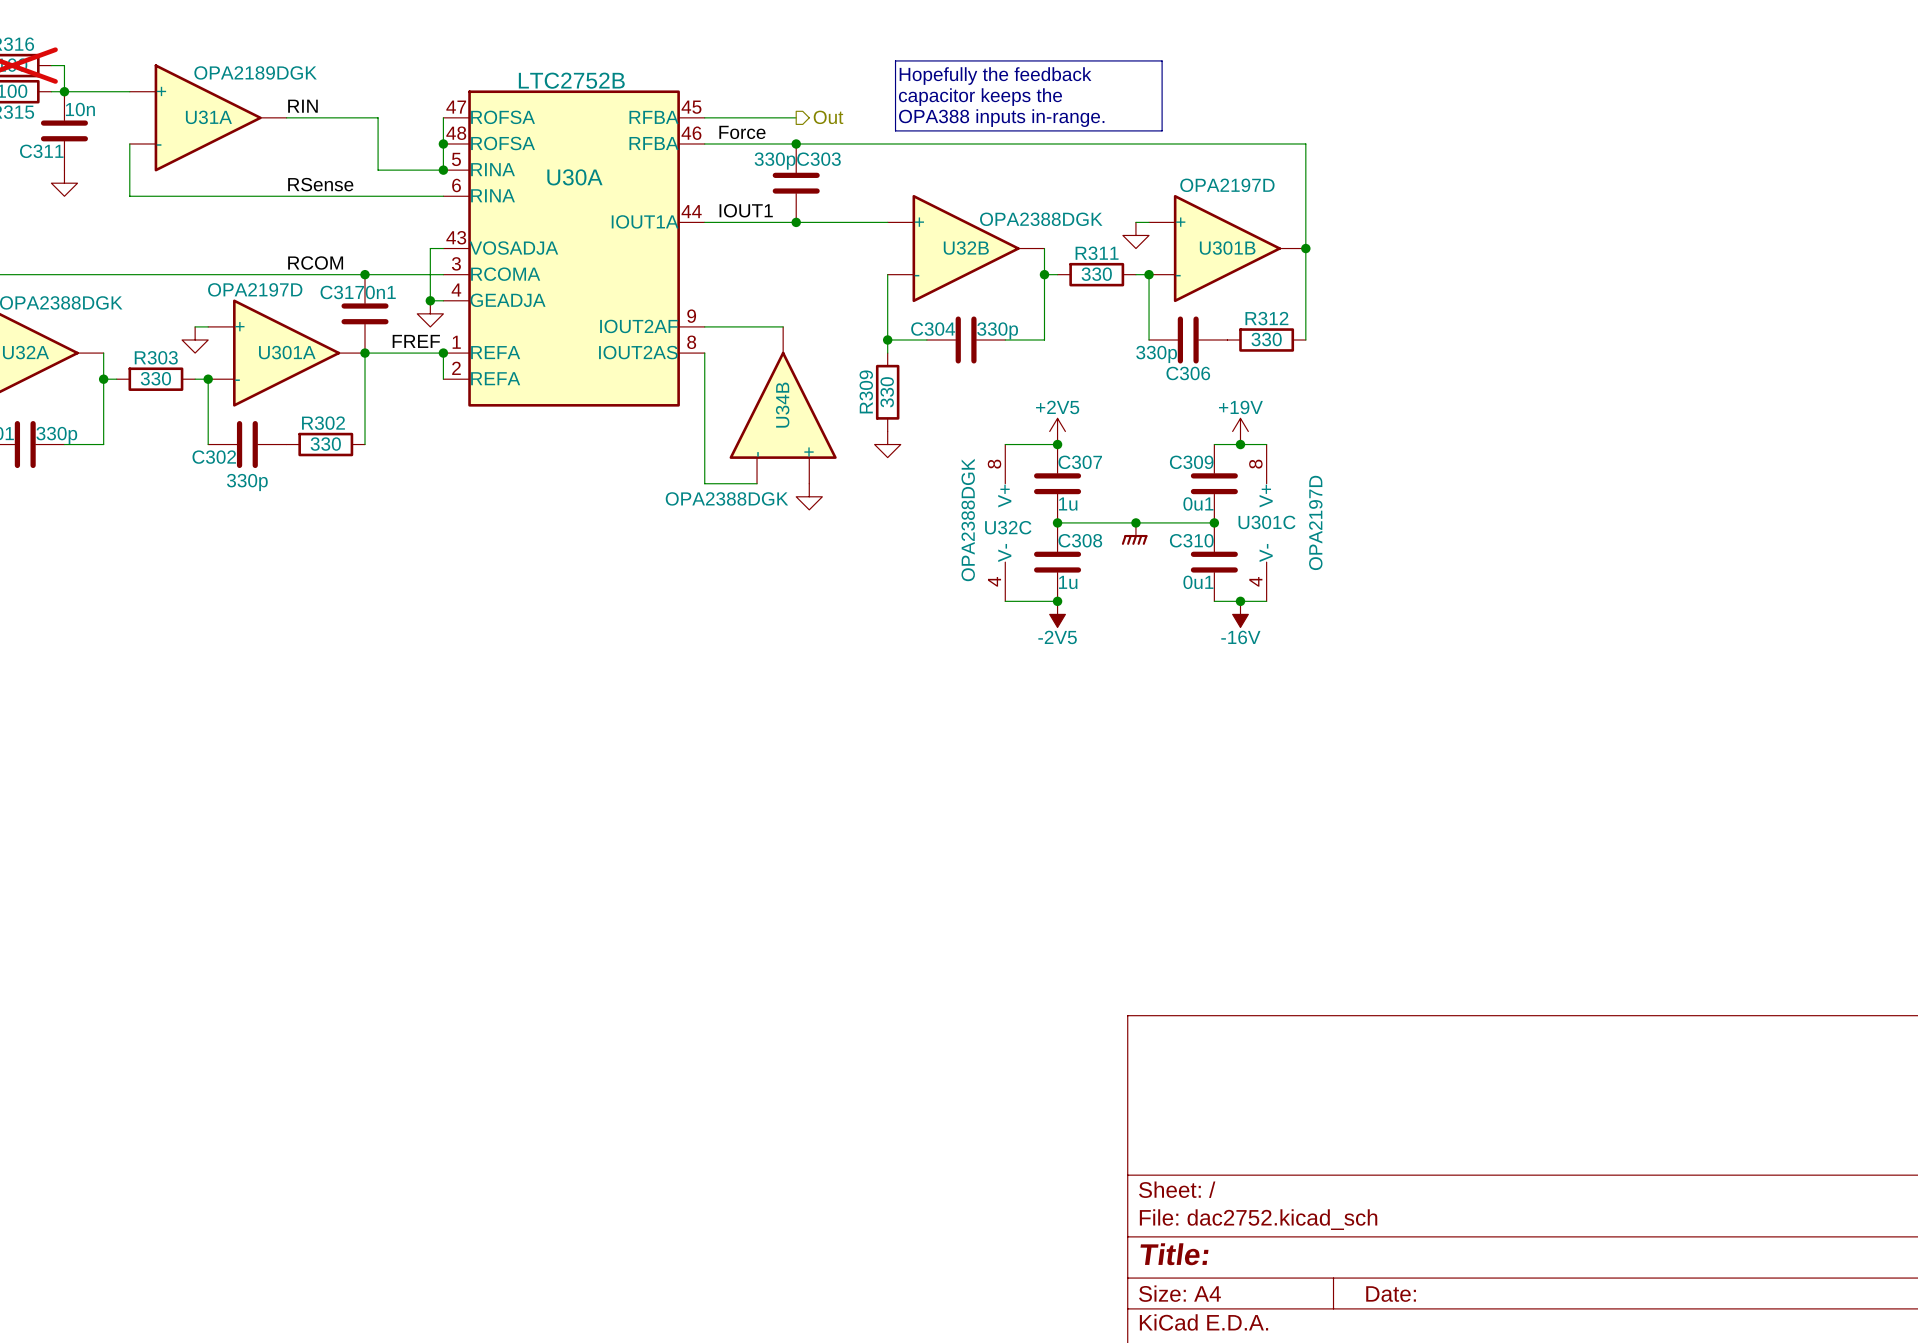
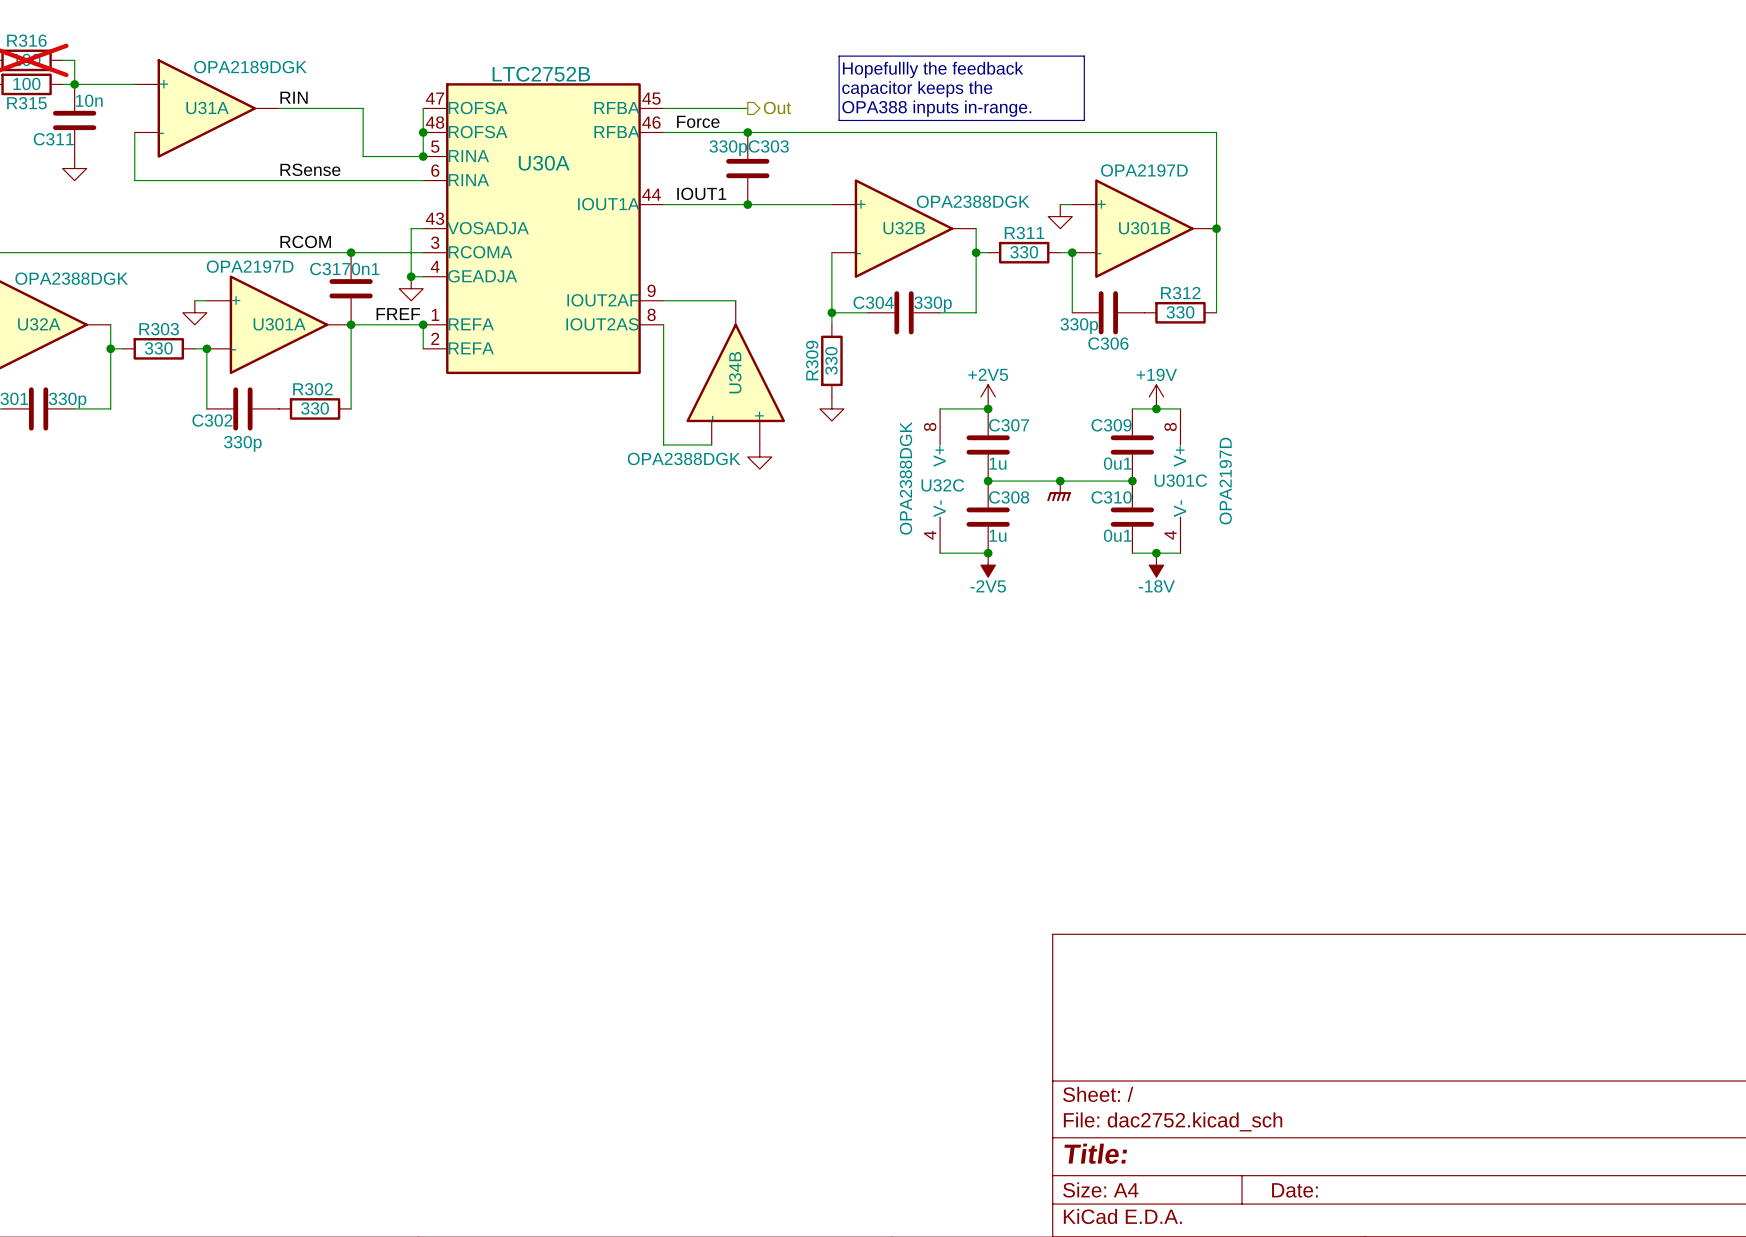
text: Hopefully the feedback (995, 76) -> Hopefullly the feedback (933, 69)
power symbol: -16V (1240, 614) -> -18V (1156, 565)

